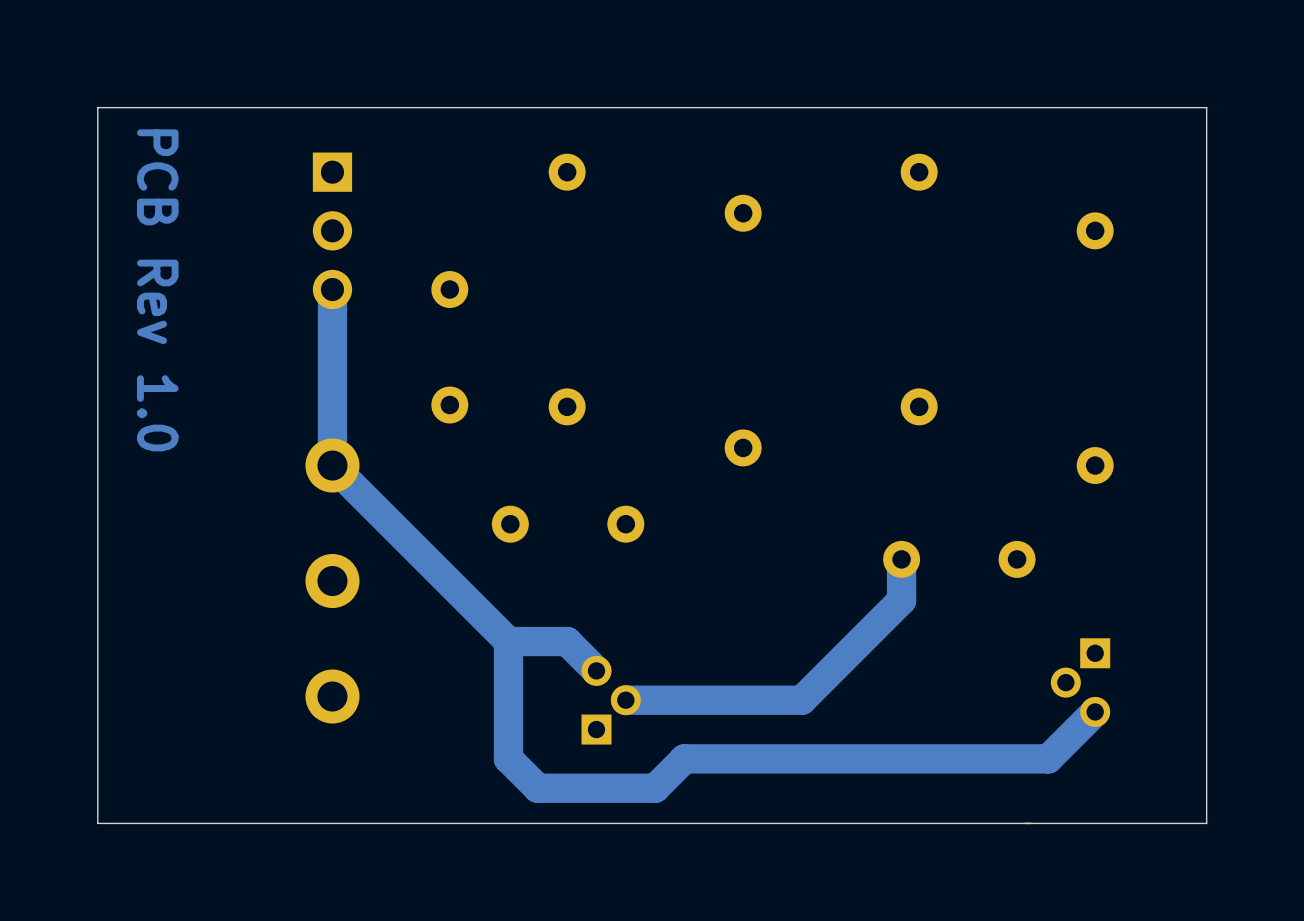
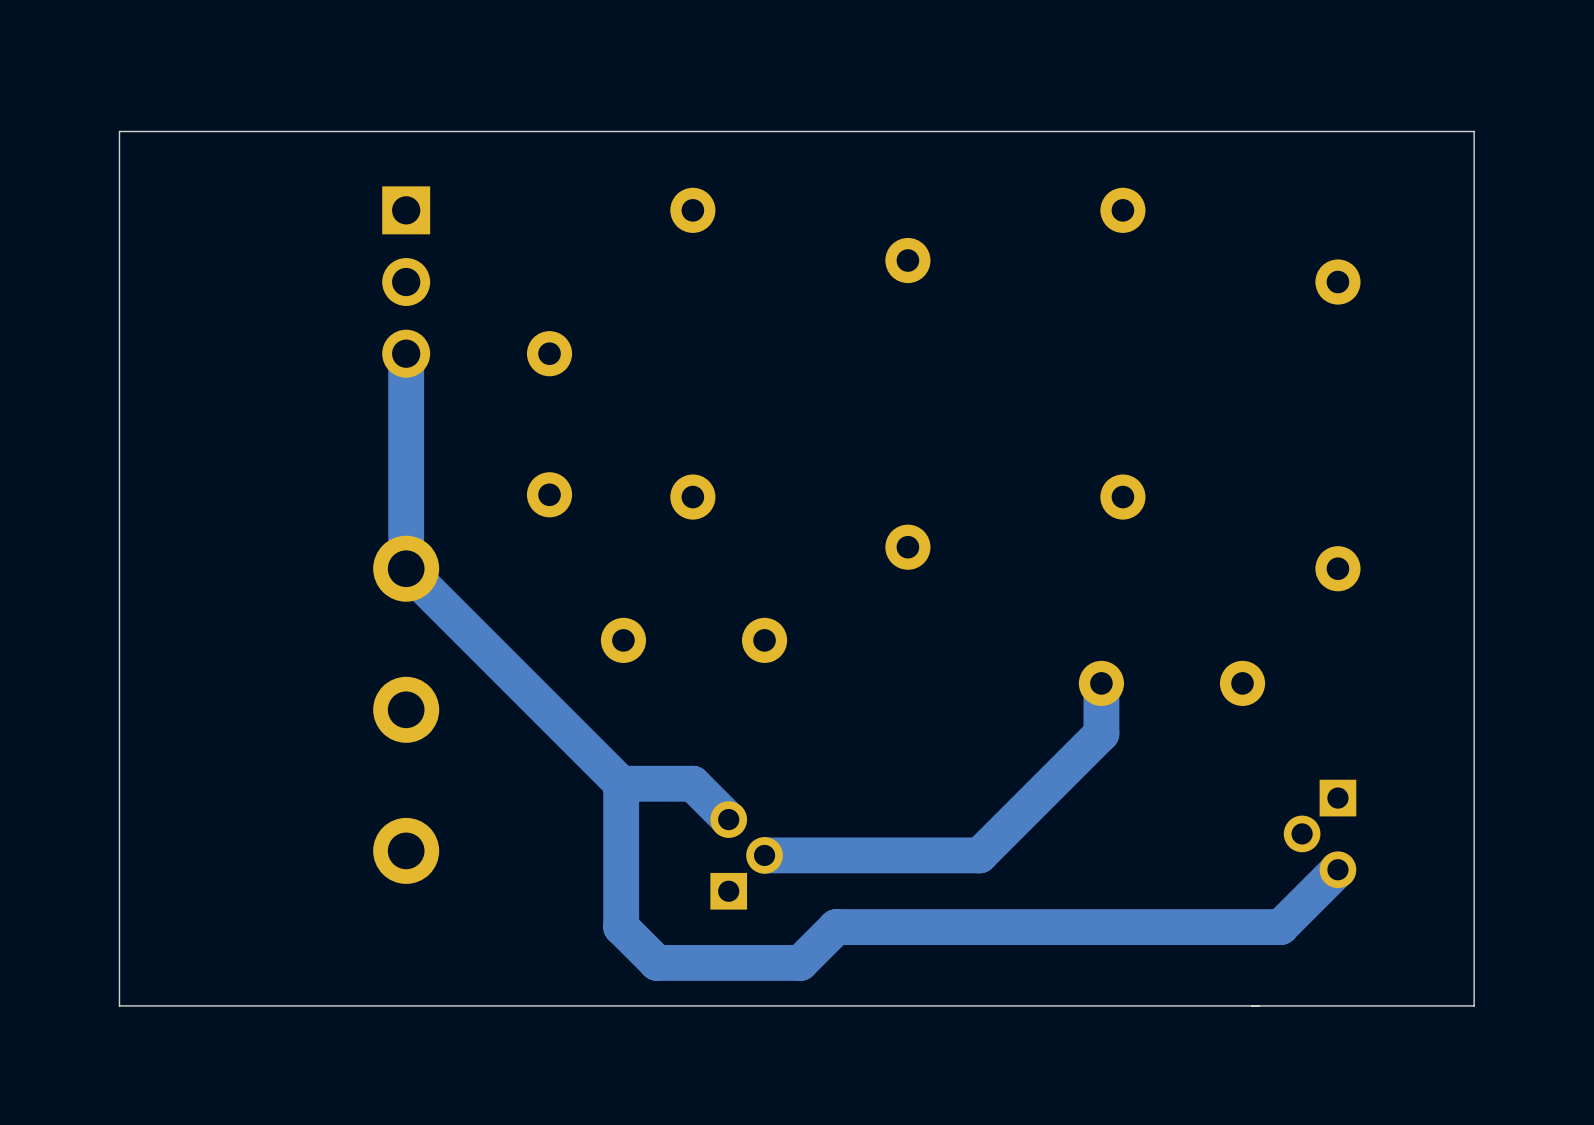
text: PCB Rev 1.0 (157, 290) -> none

